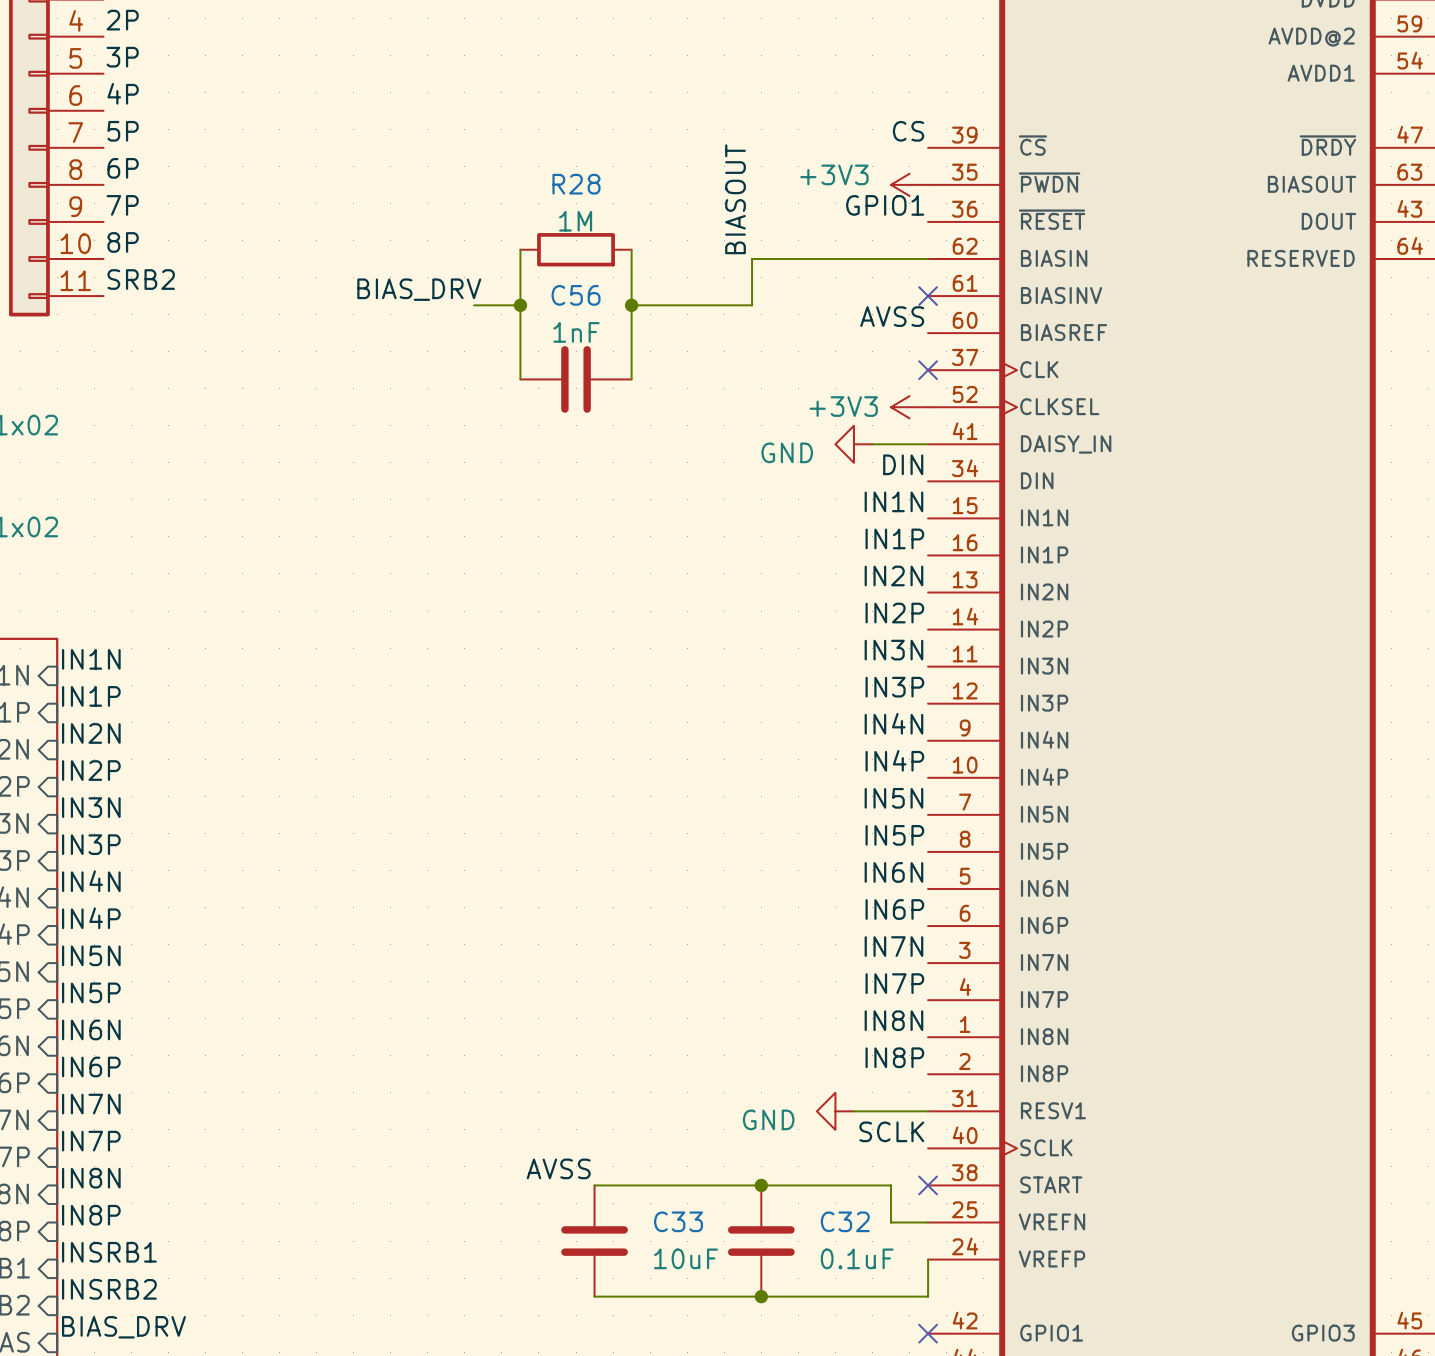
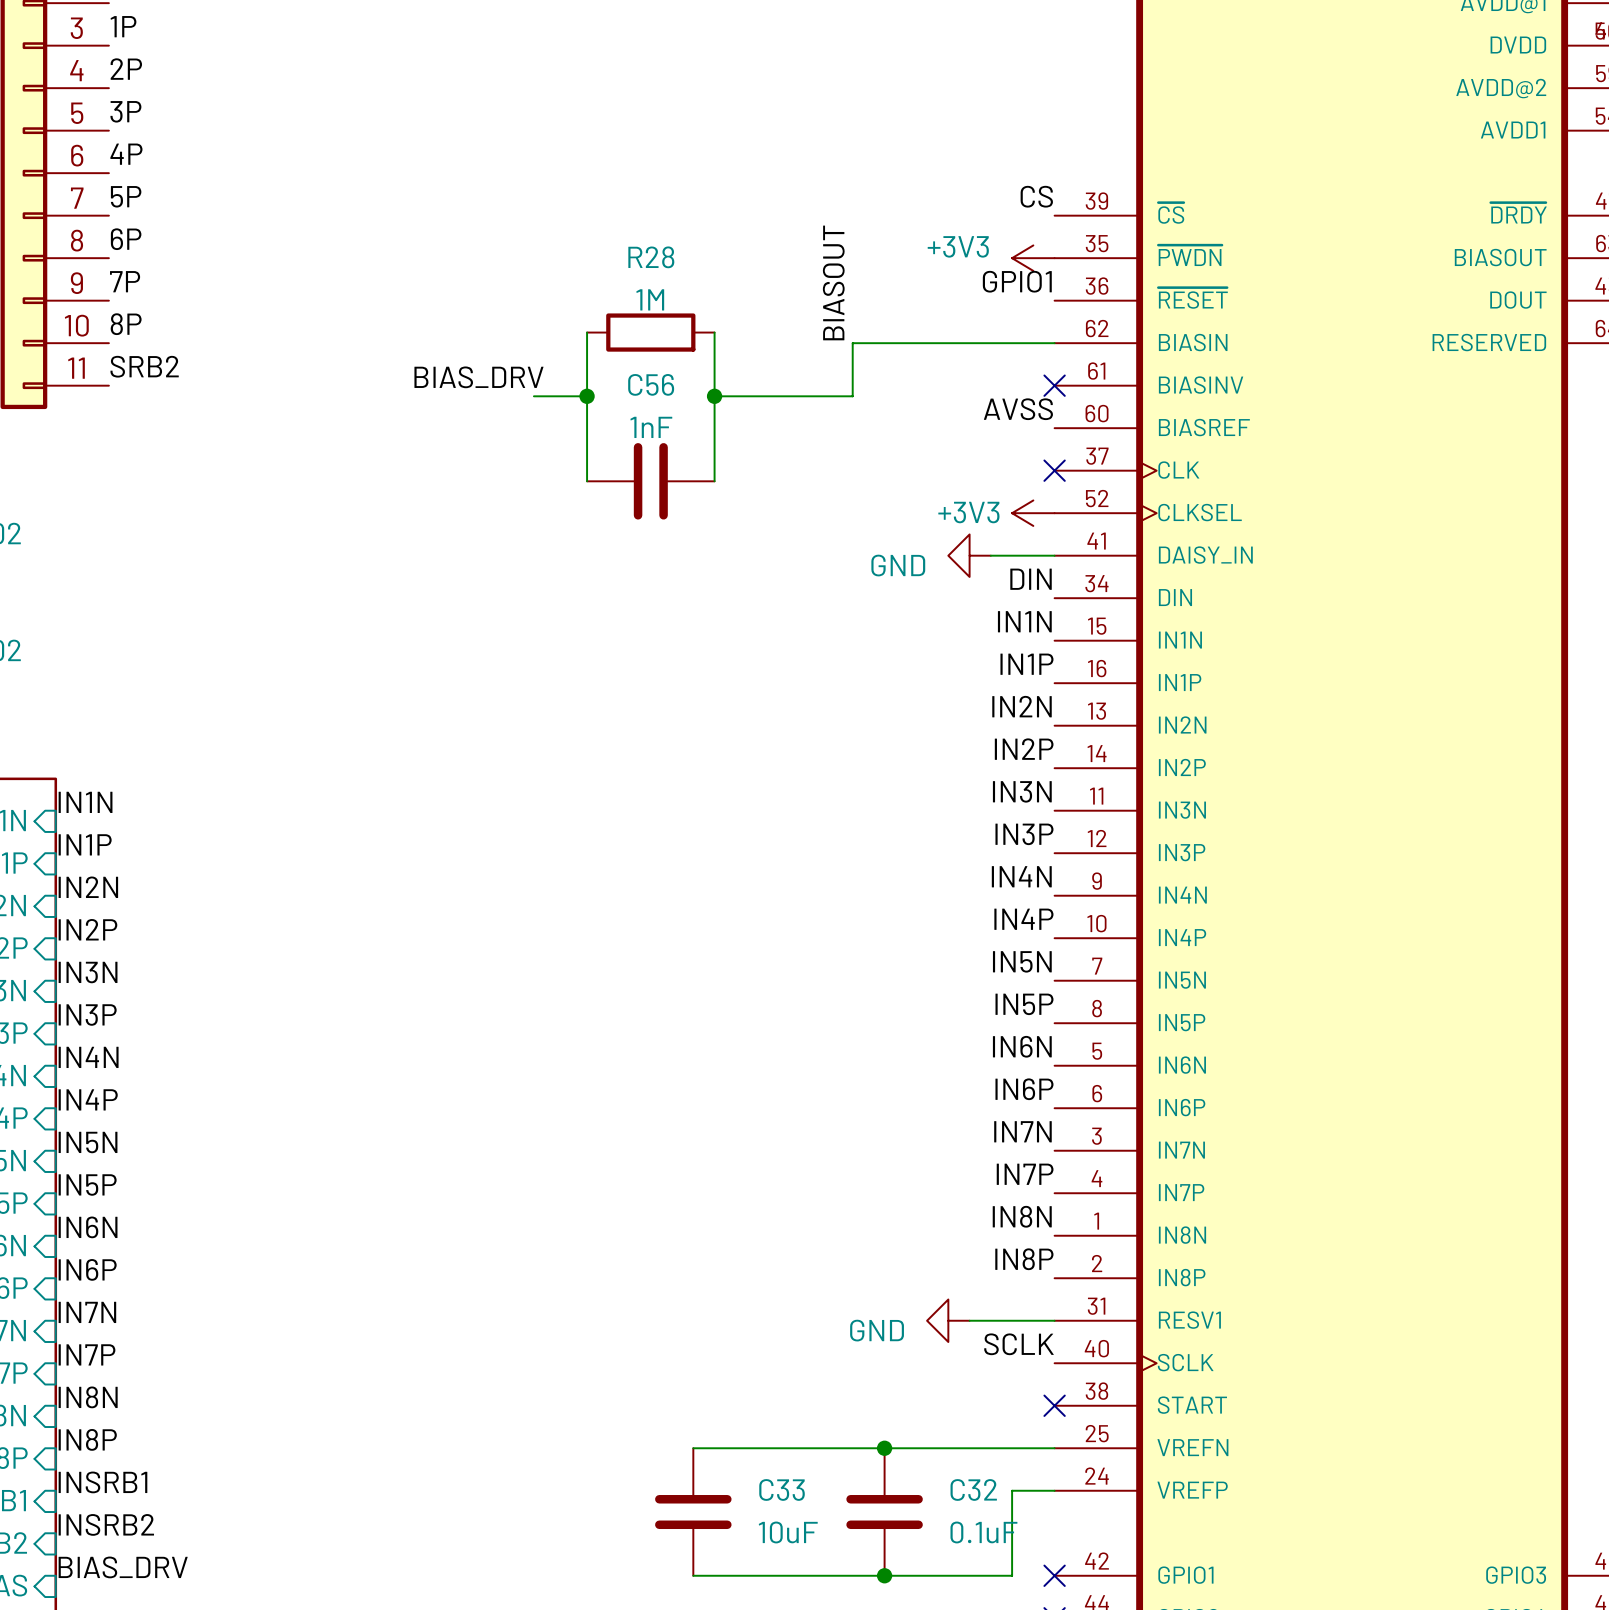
label: AVSS (558, 1168) -> none
wire: (594, 1185) (891, 1185) (891, 1222) -> (693, 1448) (1012, 1448)
junction: (761, 1185) -> none
junction: none -> (884, 1448)
C33 position: (594, 1241) -> (693, 1512)
C32 position: (761, 1241) -> (884, 1512)
wire: (928, 1259) (928, 1296) (594, 1296) -> (1054, 1490) (1012, 1490) (1012, 1575) (693, 1575)
junction: (761, 1296) -> none
junction: none -> (884, 1575)

